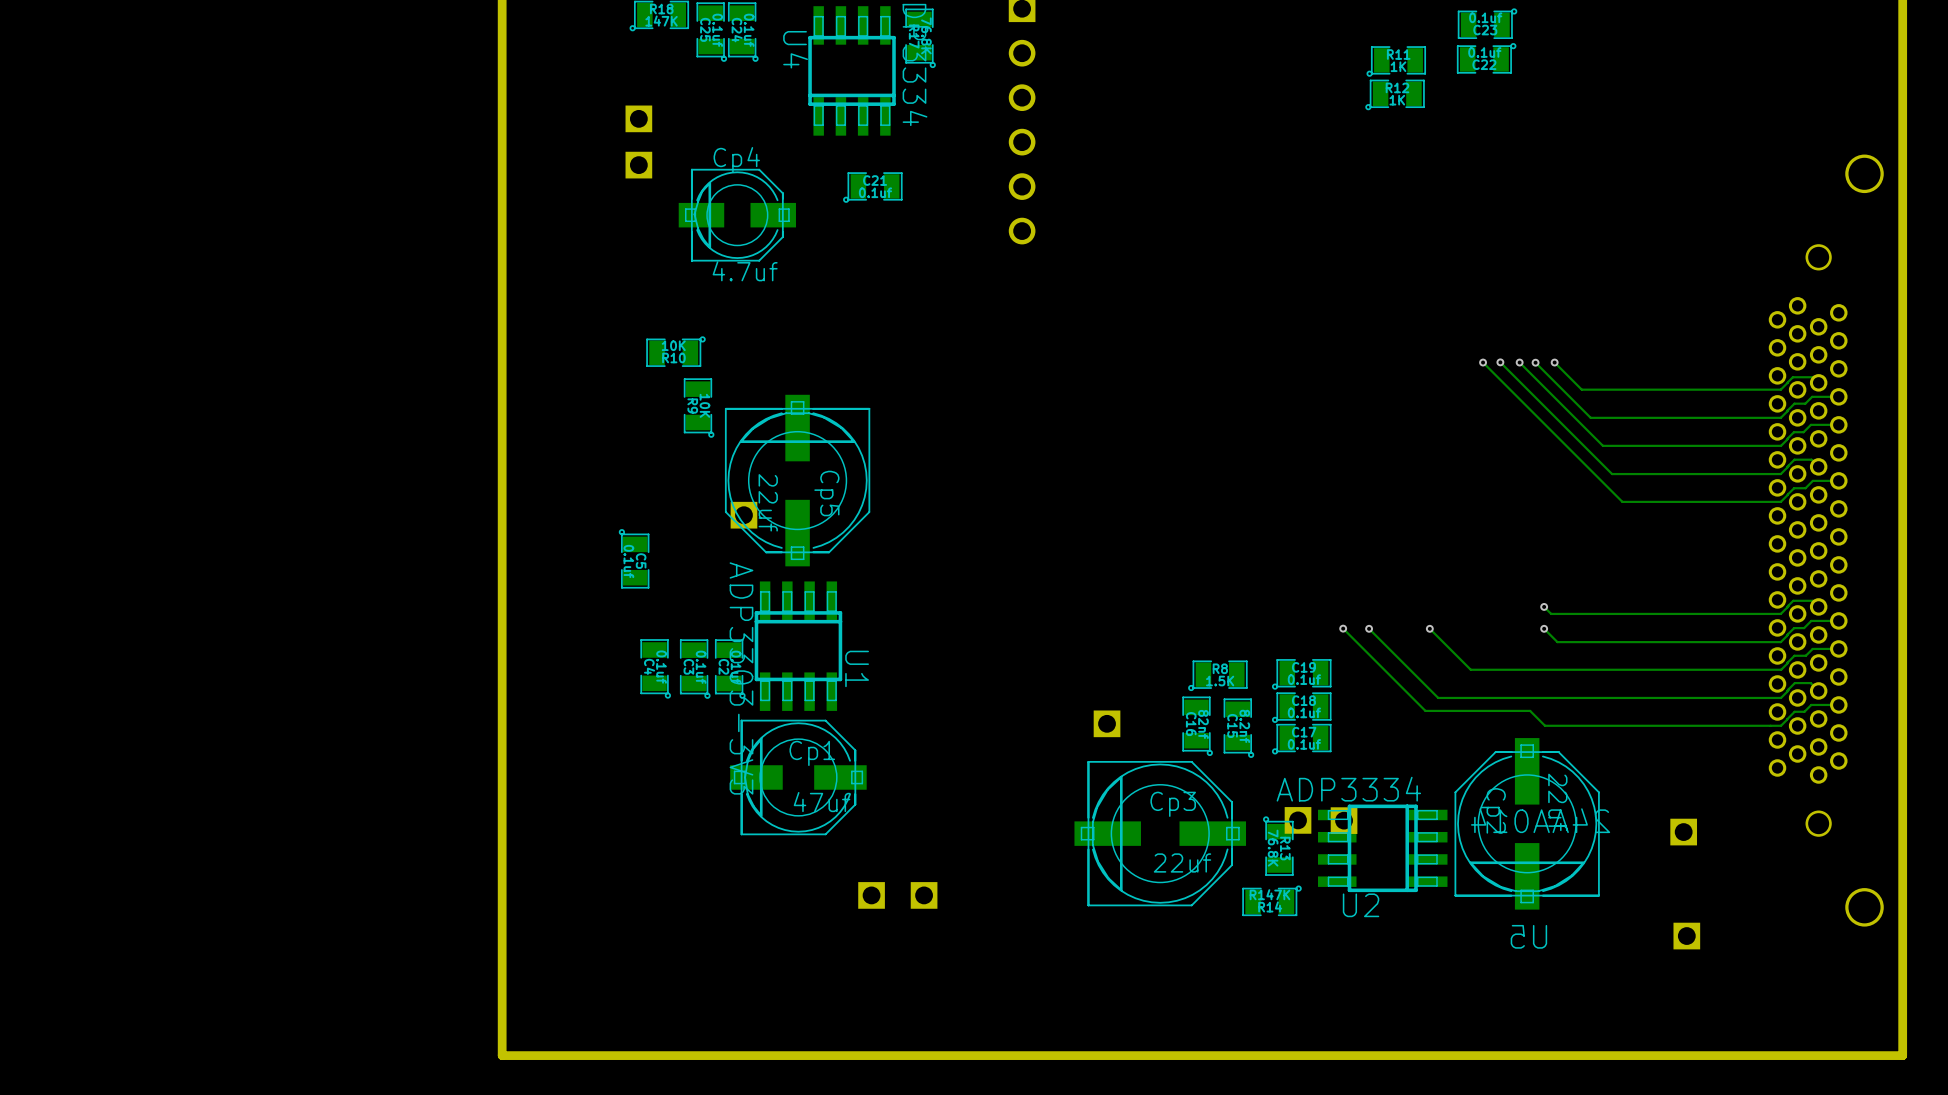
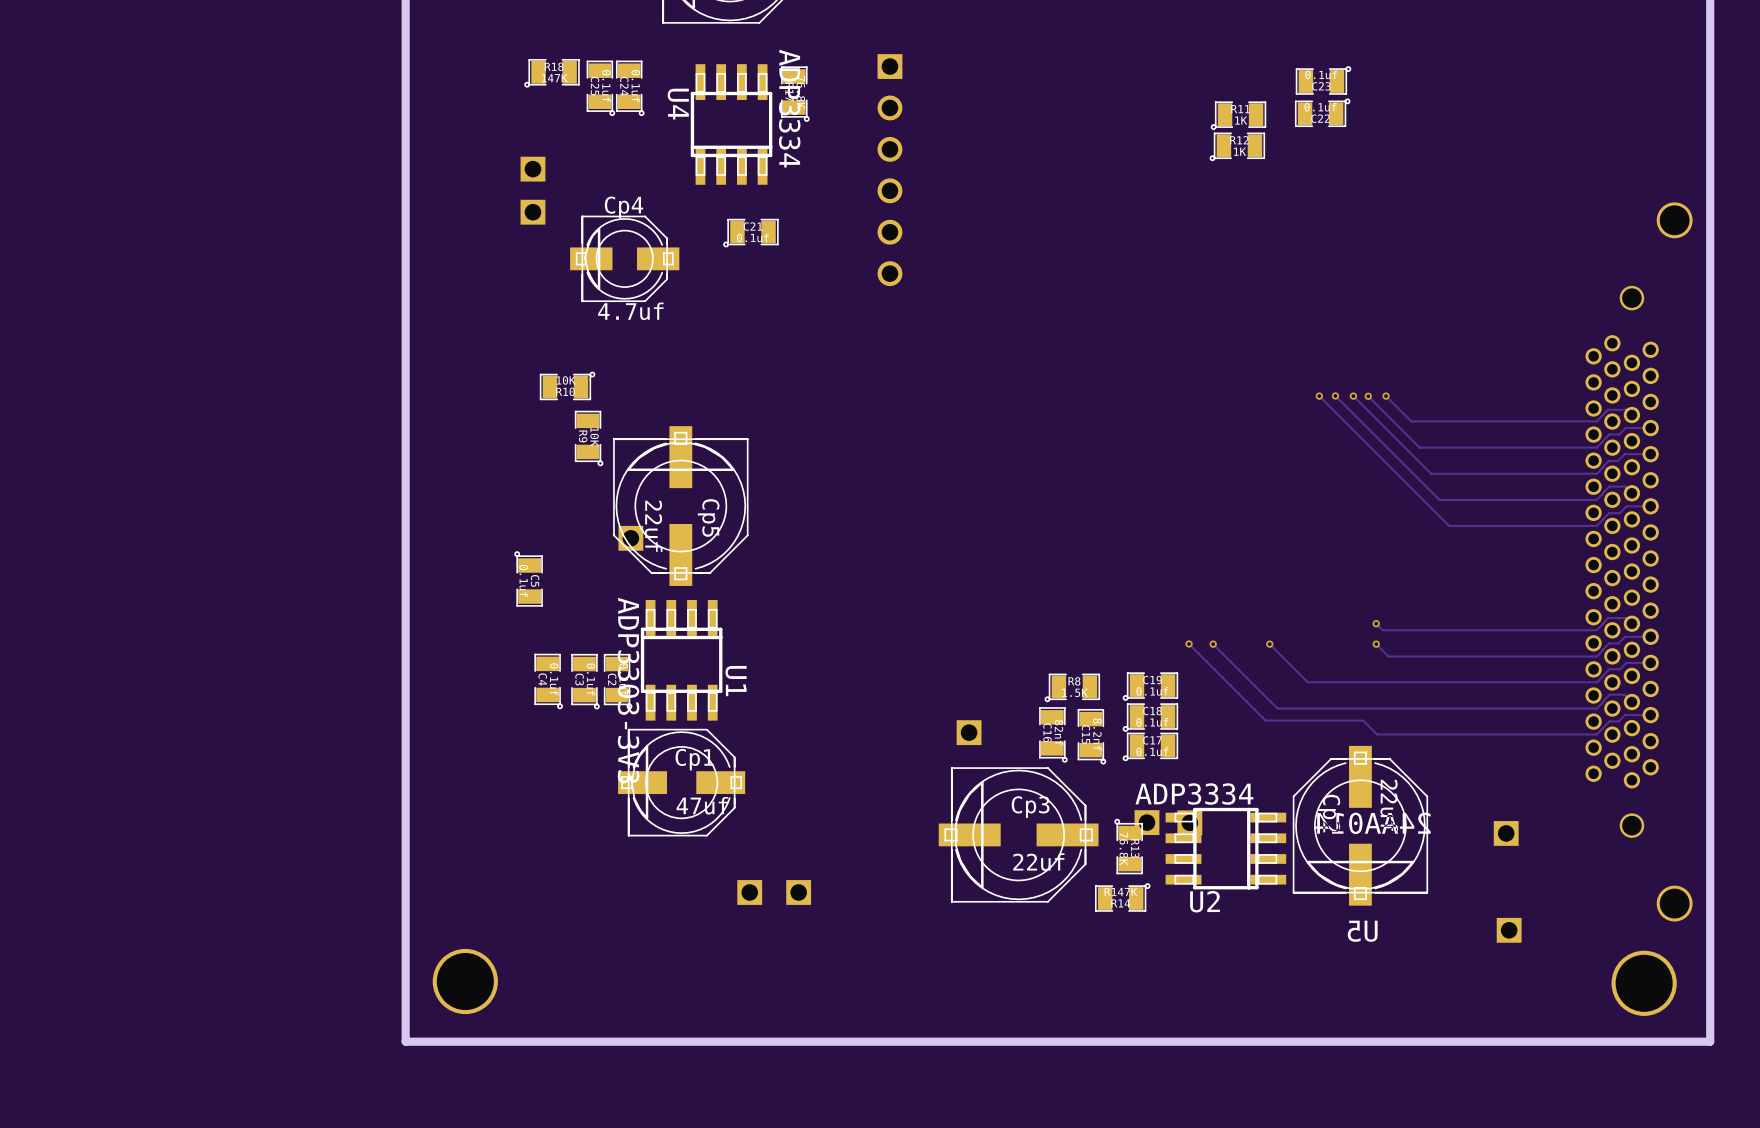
part: none -> (465, 981)
part: none -> (1644, 983)

